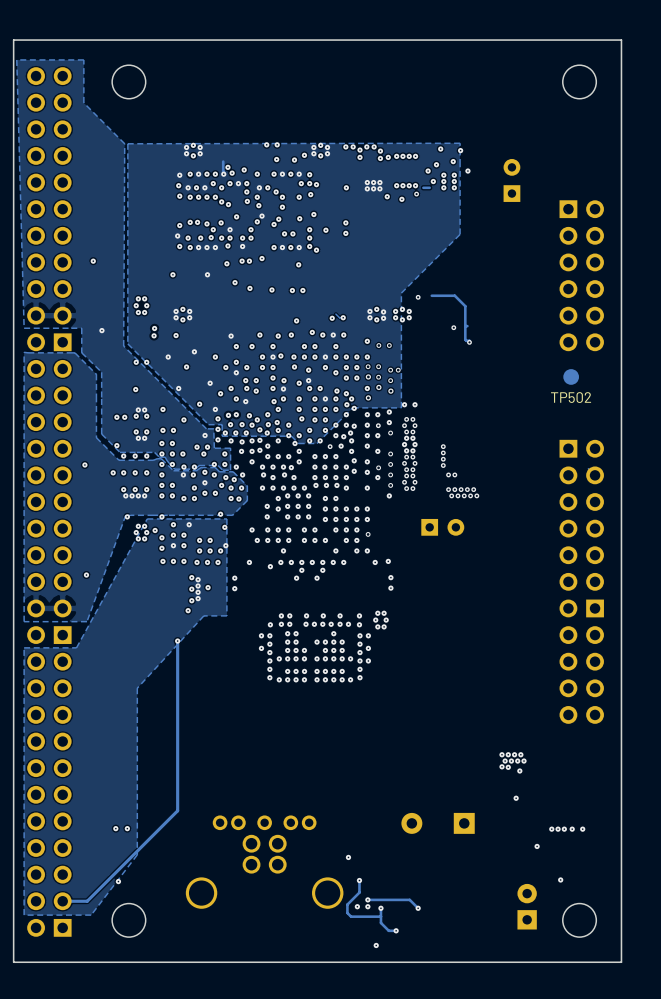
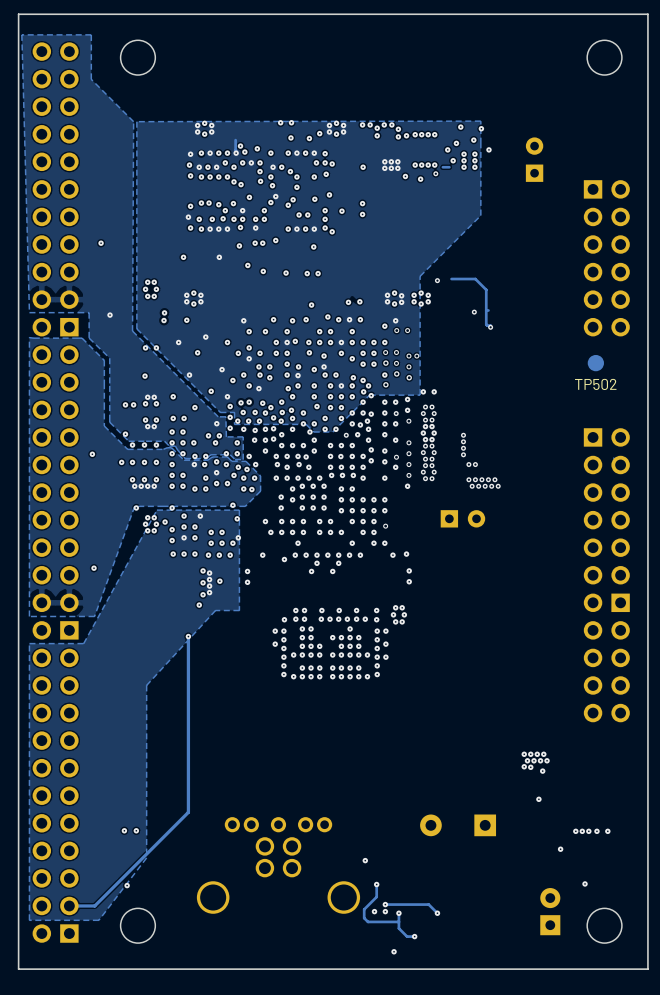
track: (335, 314) (339, 317) (343, 317) -> none
via: none -> (395, 320)

